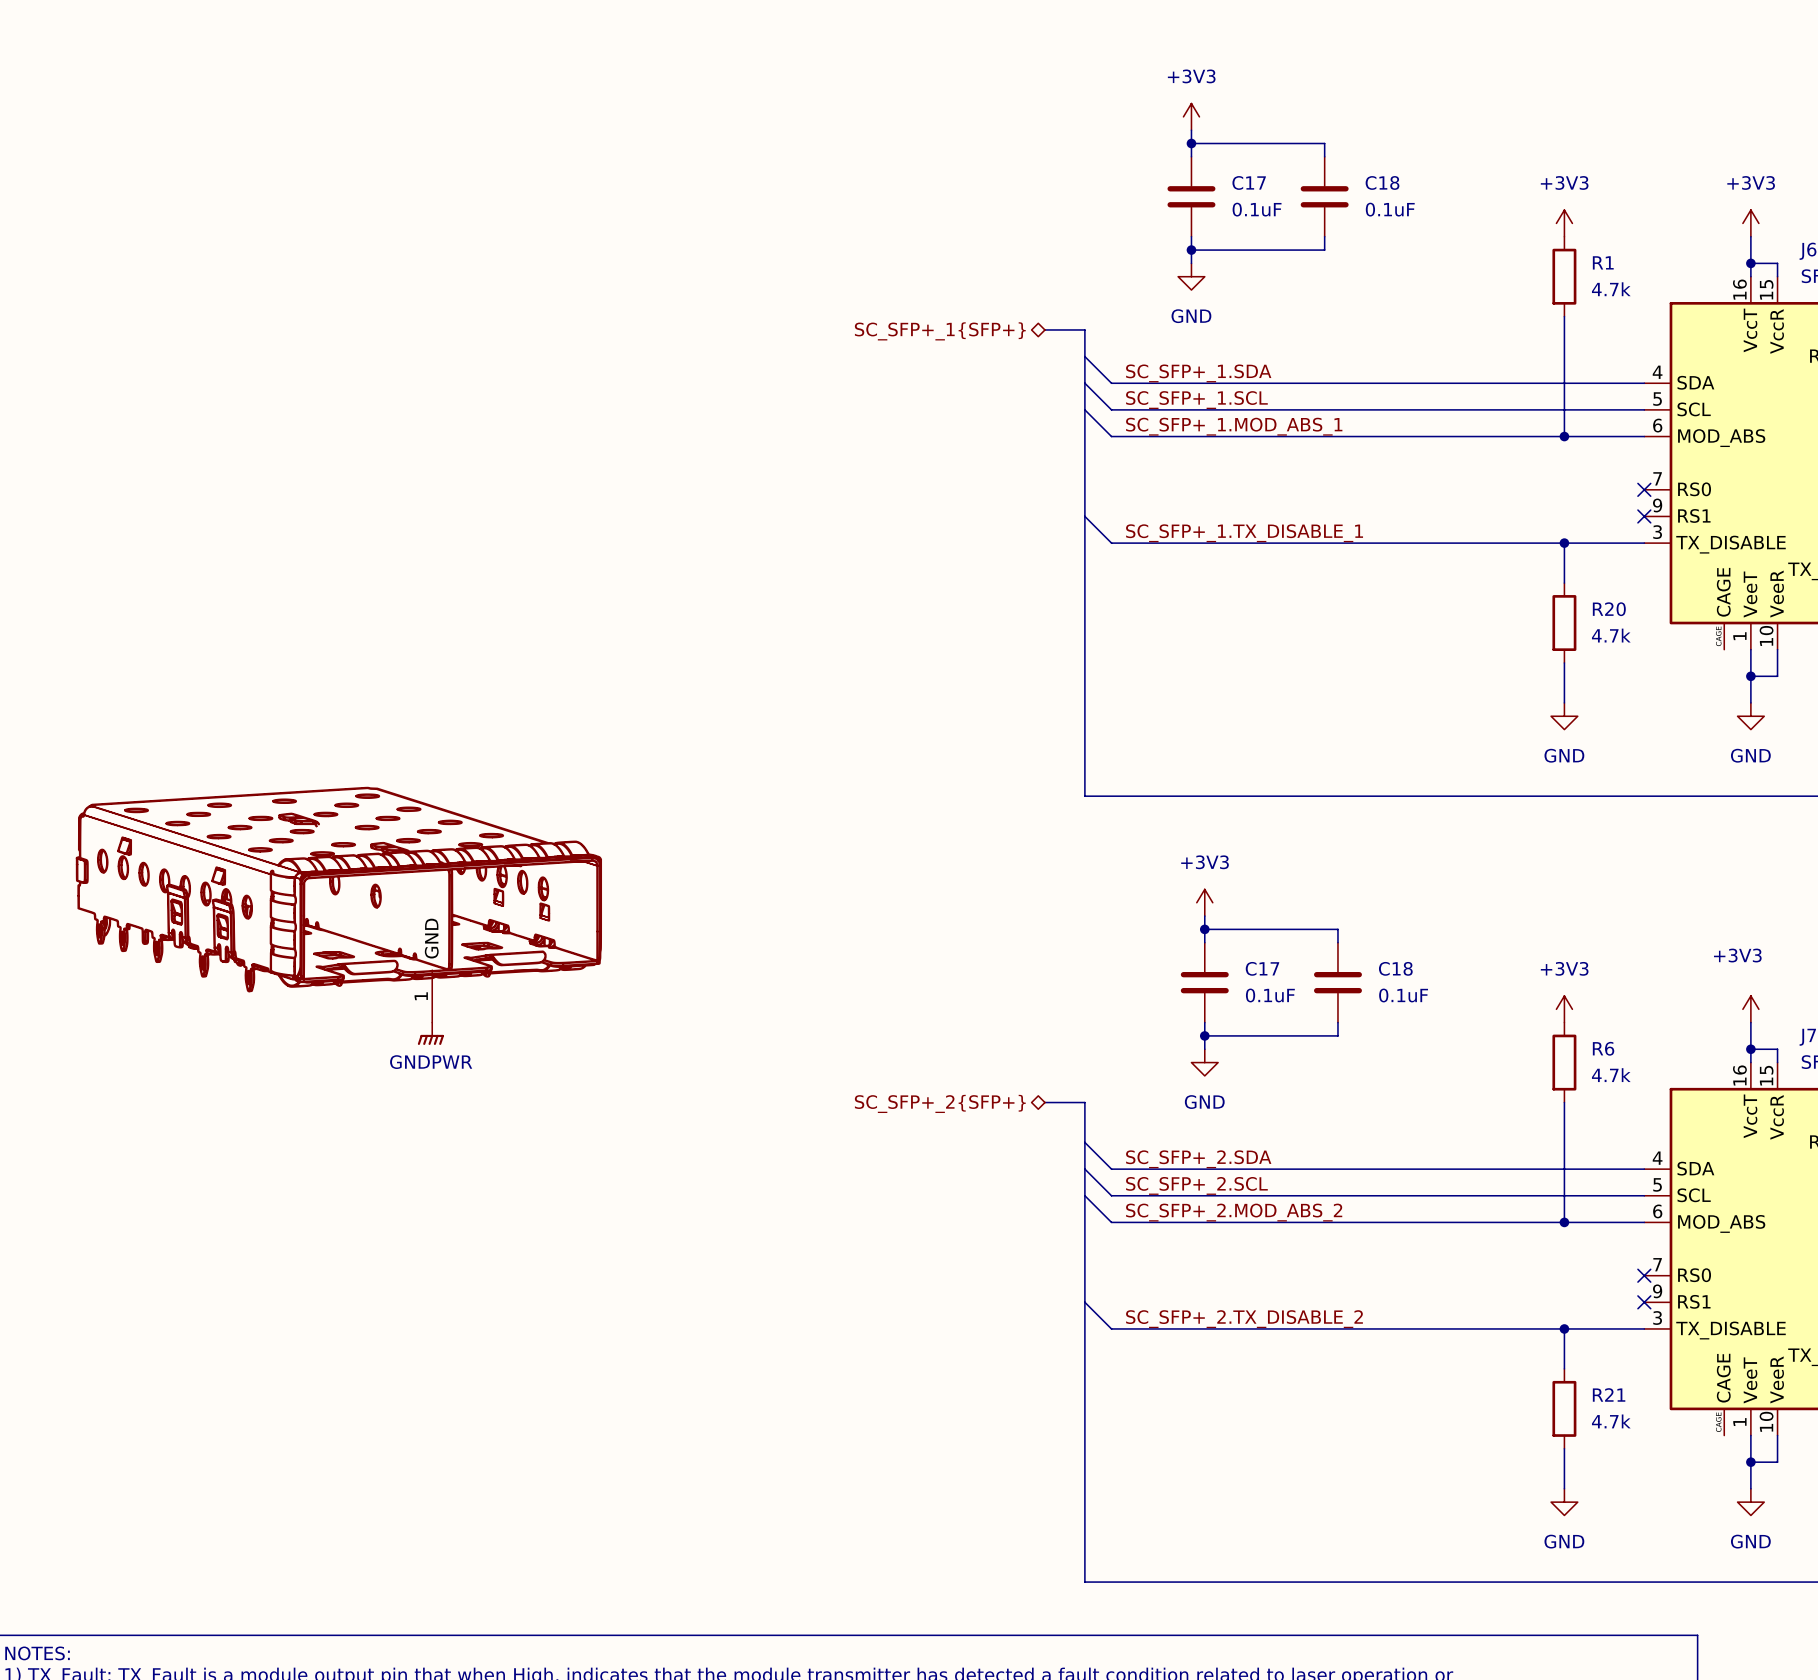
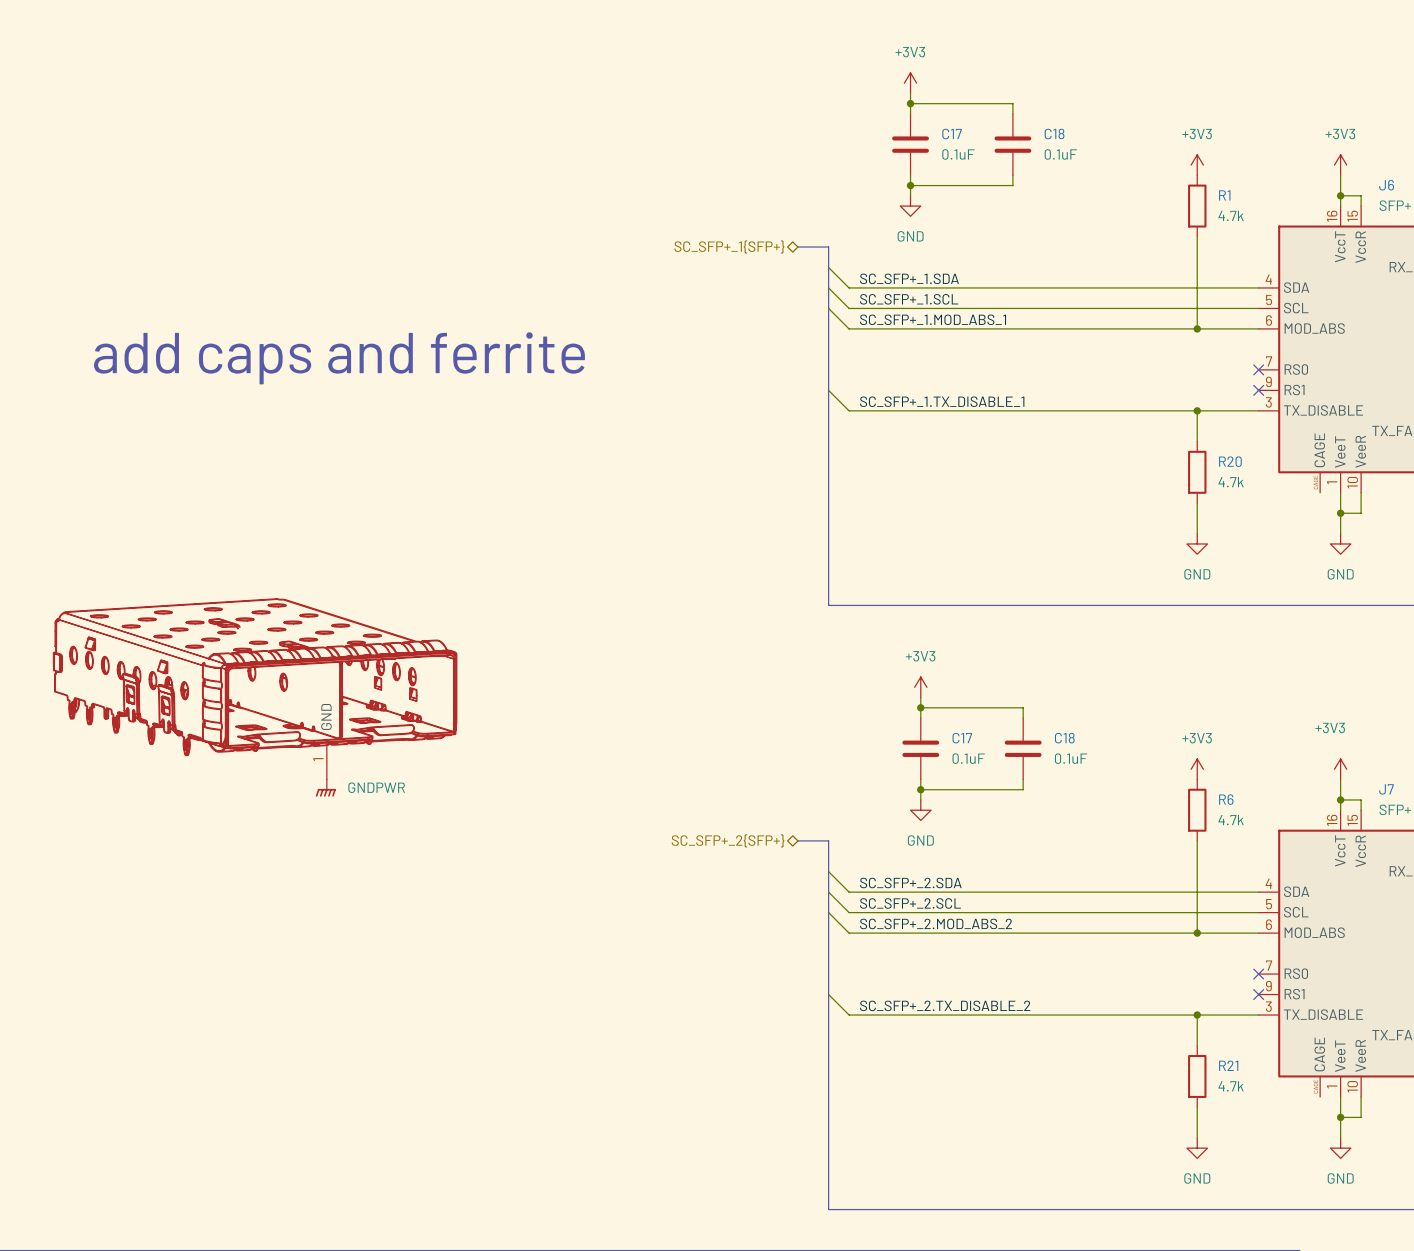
text: none -> add caps and ferrite (339, 358)
power symbol text position: GNDPWR (431, 1062) -> GNDPWR (376, 787)

